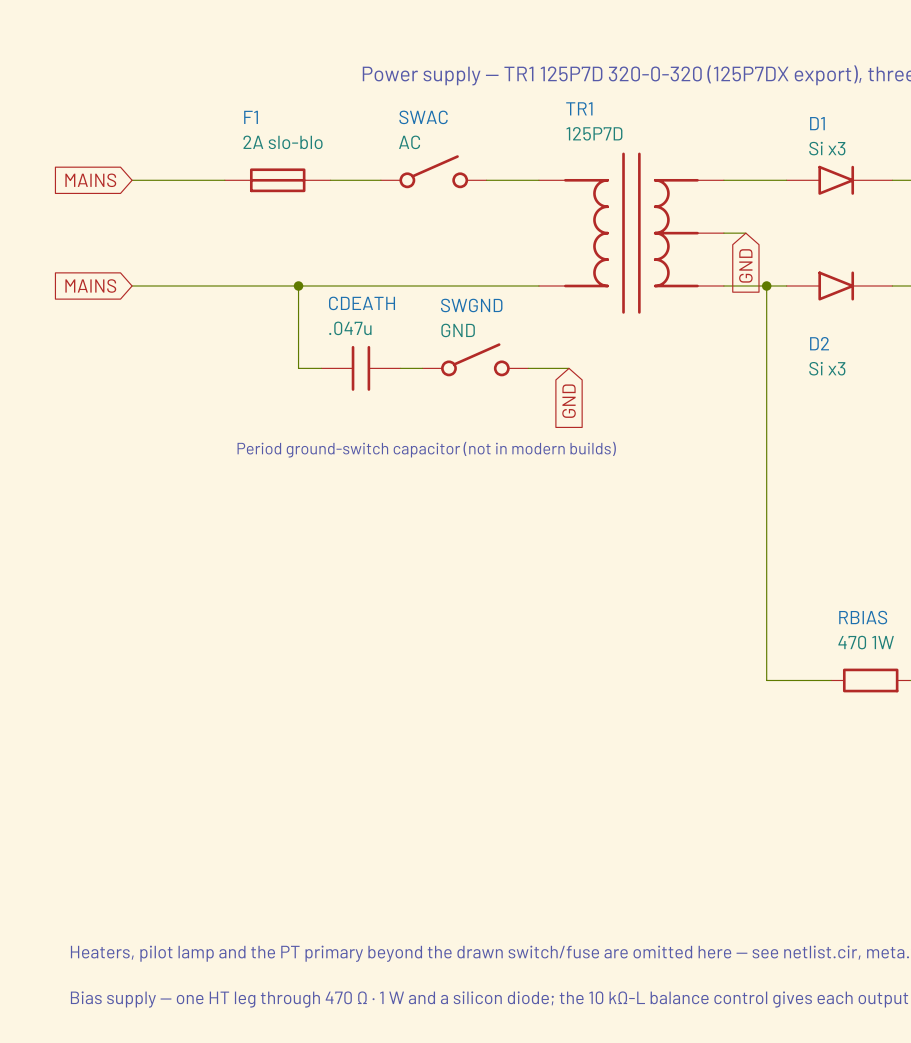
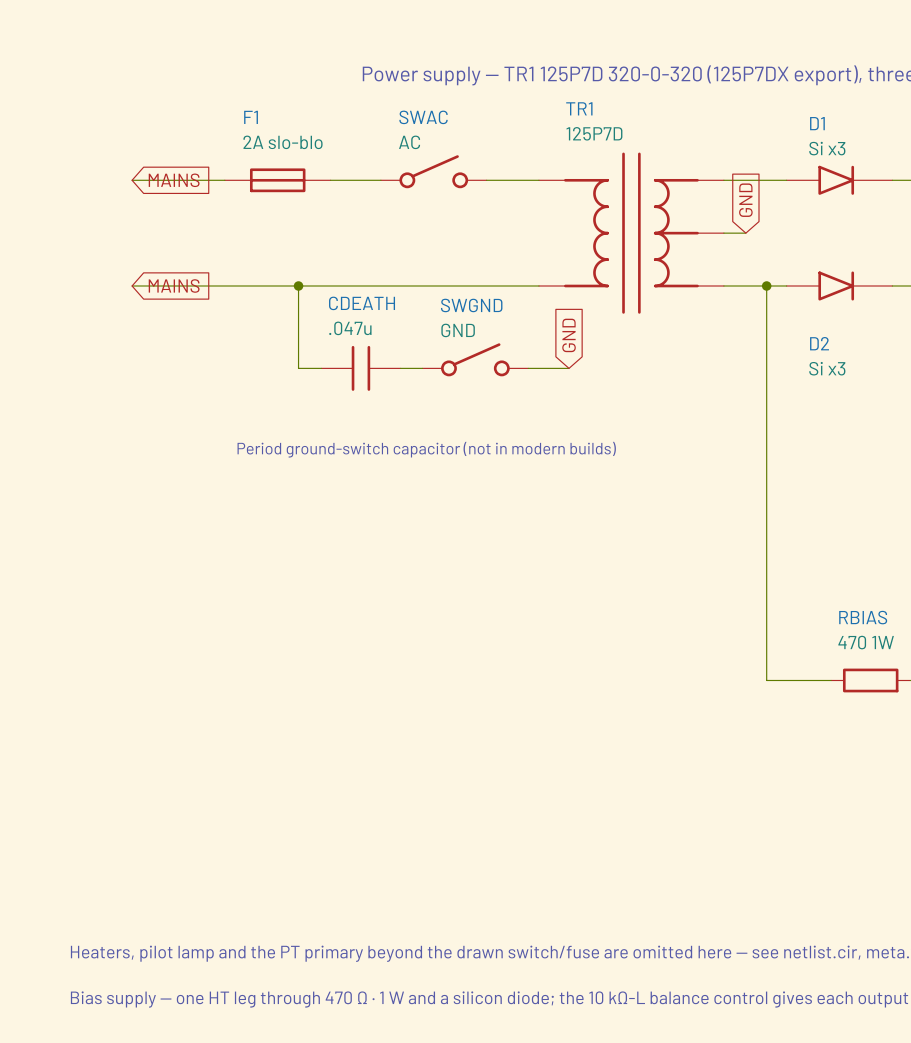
global label rotation: 0° (90, 180) -> 180° (174, 180)
global label rotation: 0° (745, 265) -> 180° (745, 200)
global label rotation: 0° (90, 286) -> 180° (174, 286)
global label rotation: 0° (569, 401) -> 180° (569, 335)

